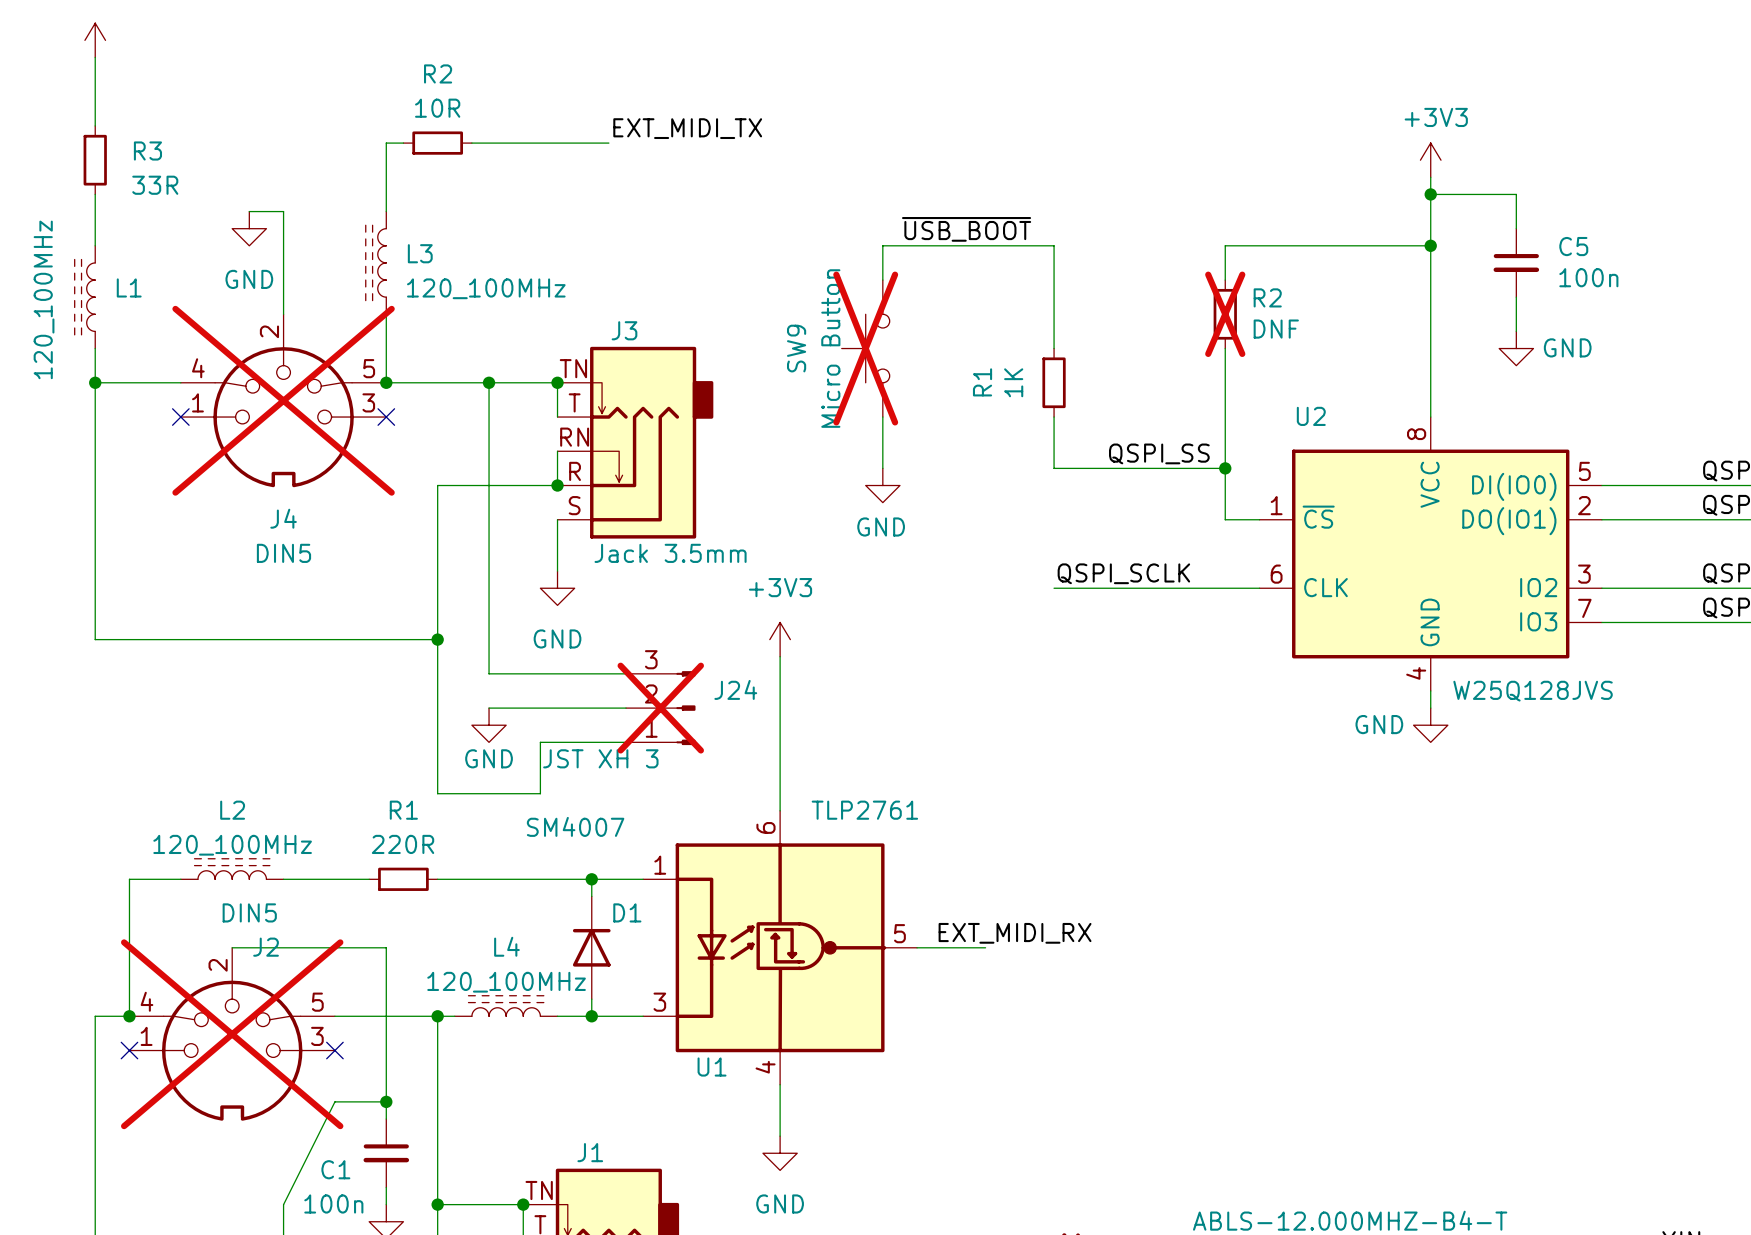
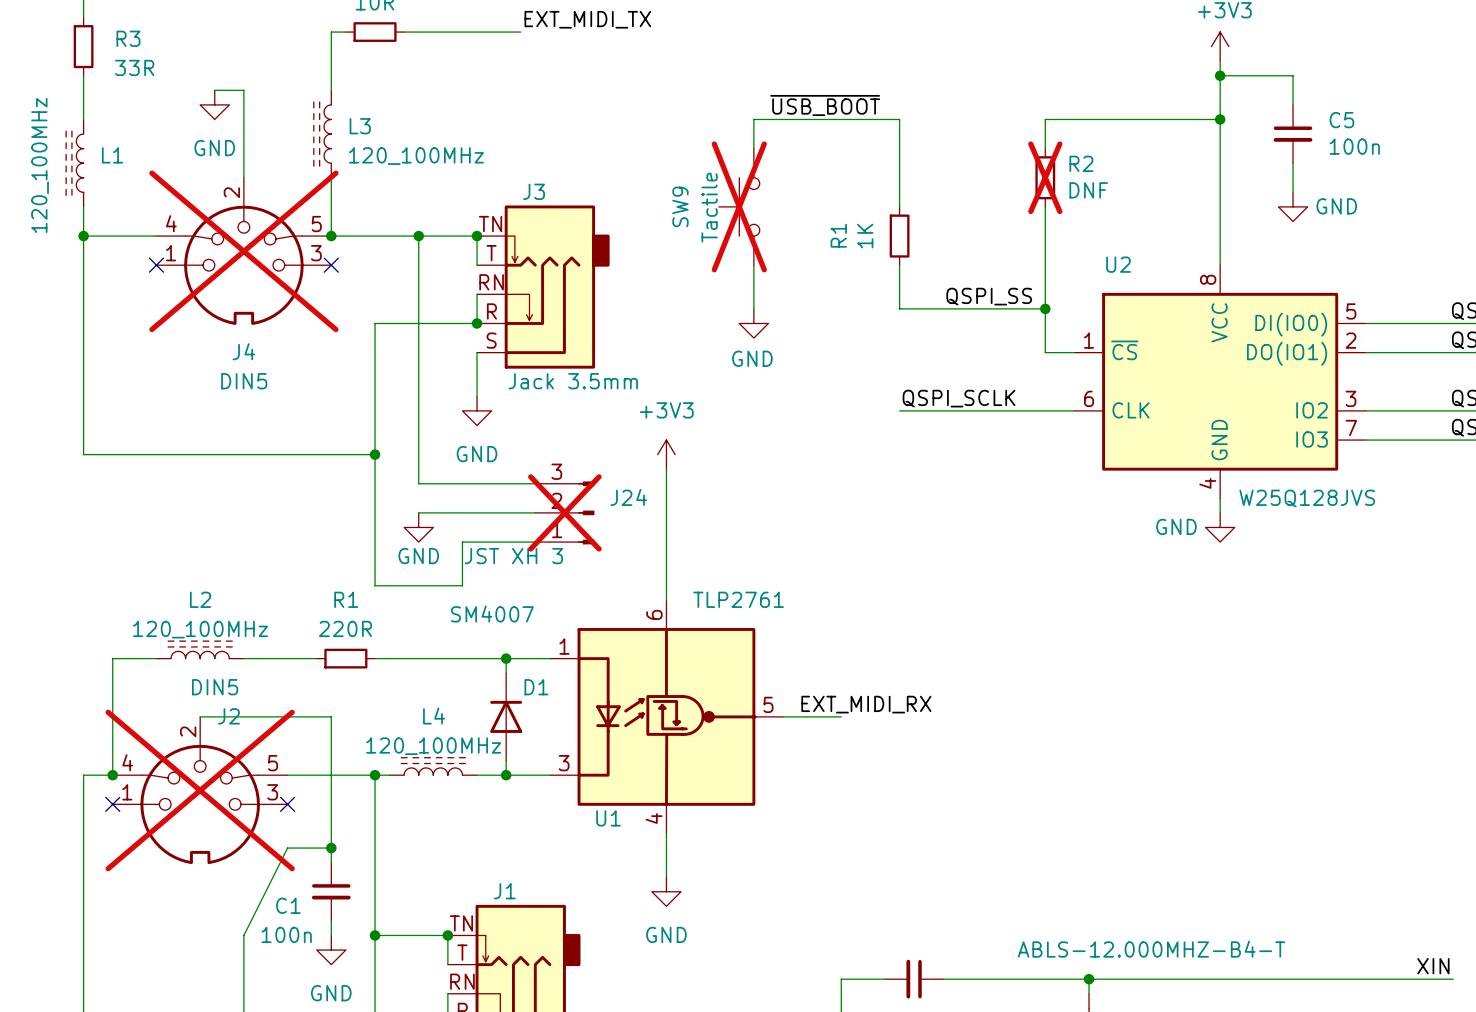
SW9 value: Micro Button (830, 348) -> Tactile (709, 207)

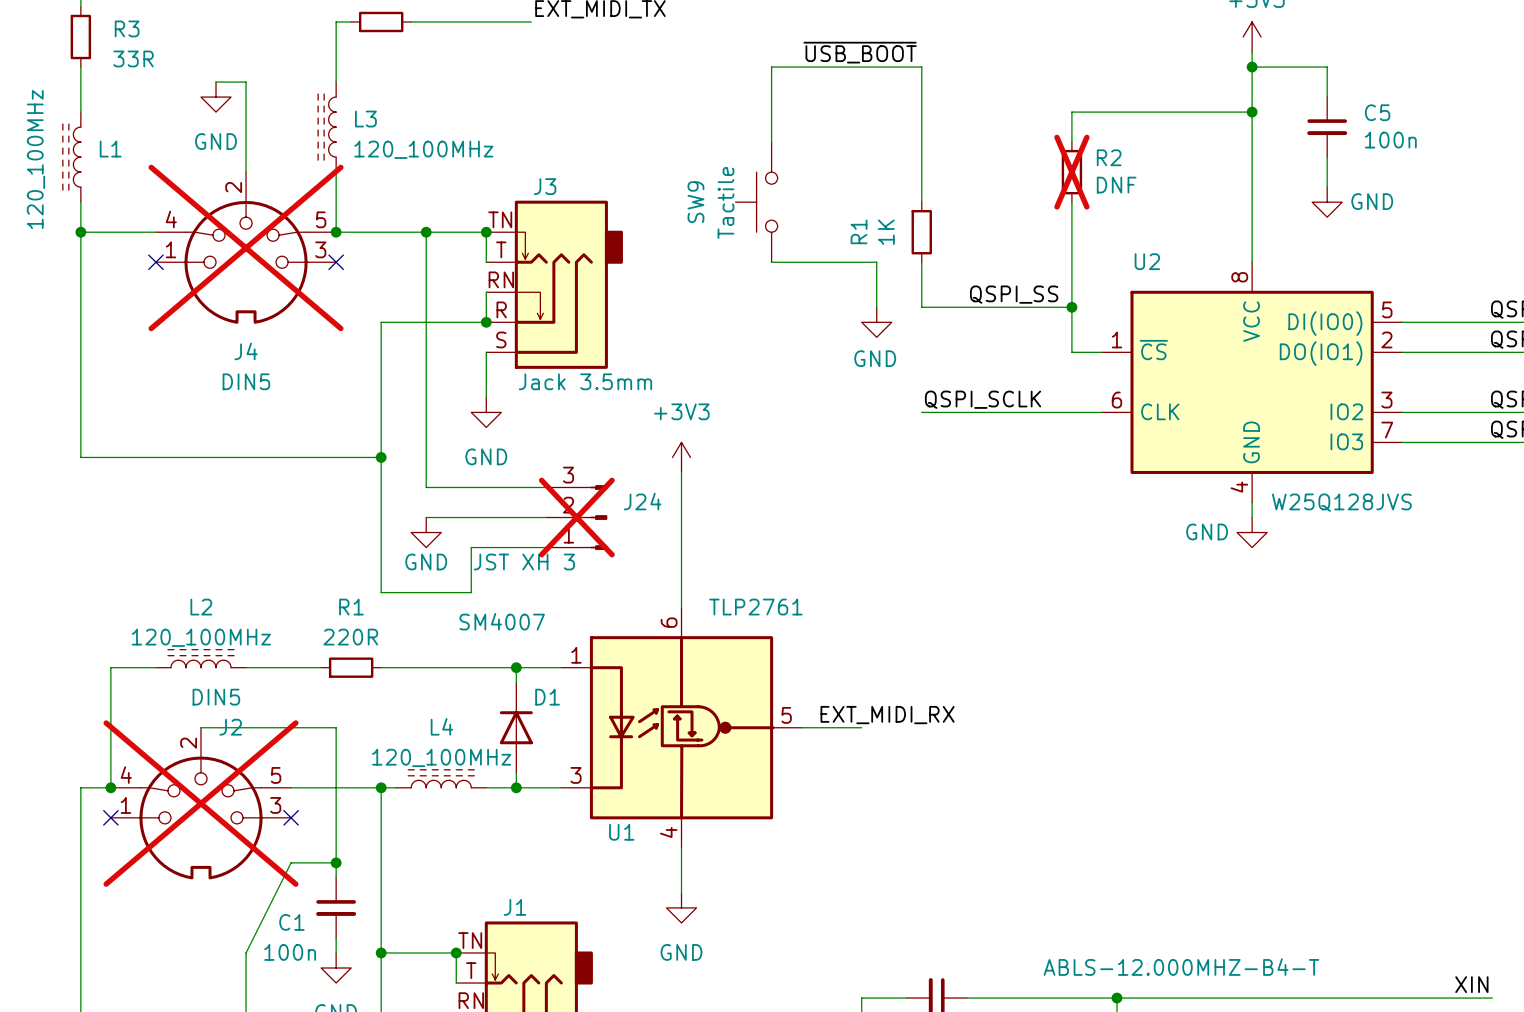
label position: ~{USB_BOOT} (825, 105) -> ~{USB_BOOT} (860, 52)
wire: (753, 119) (899, 119) -> (771, 112) (771, 67) (921, 67) (921, 112)
SW9 do-not-place cross: (739, 206) -> none
wire: (753, 265) (753, 308) -> (771, 262) (876, 262) (876, 307)
power symbol position: GND (753, 323) -> GND (876, 322)

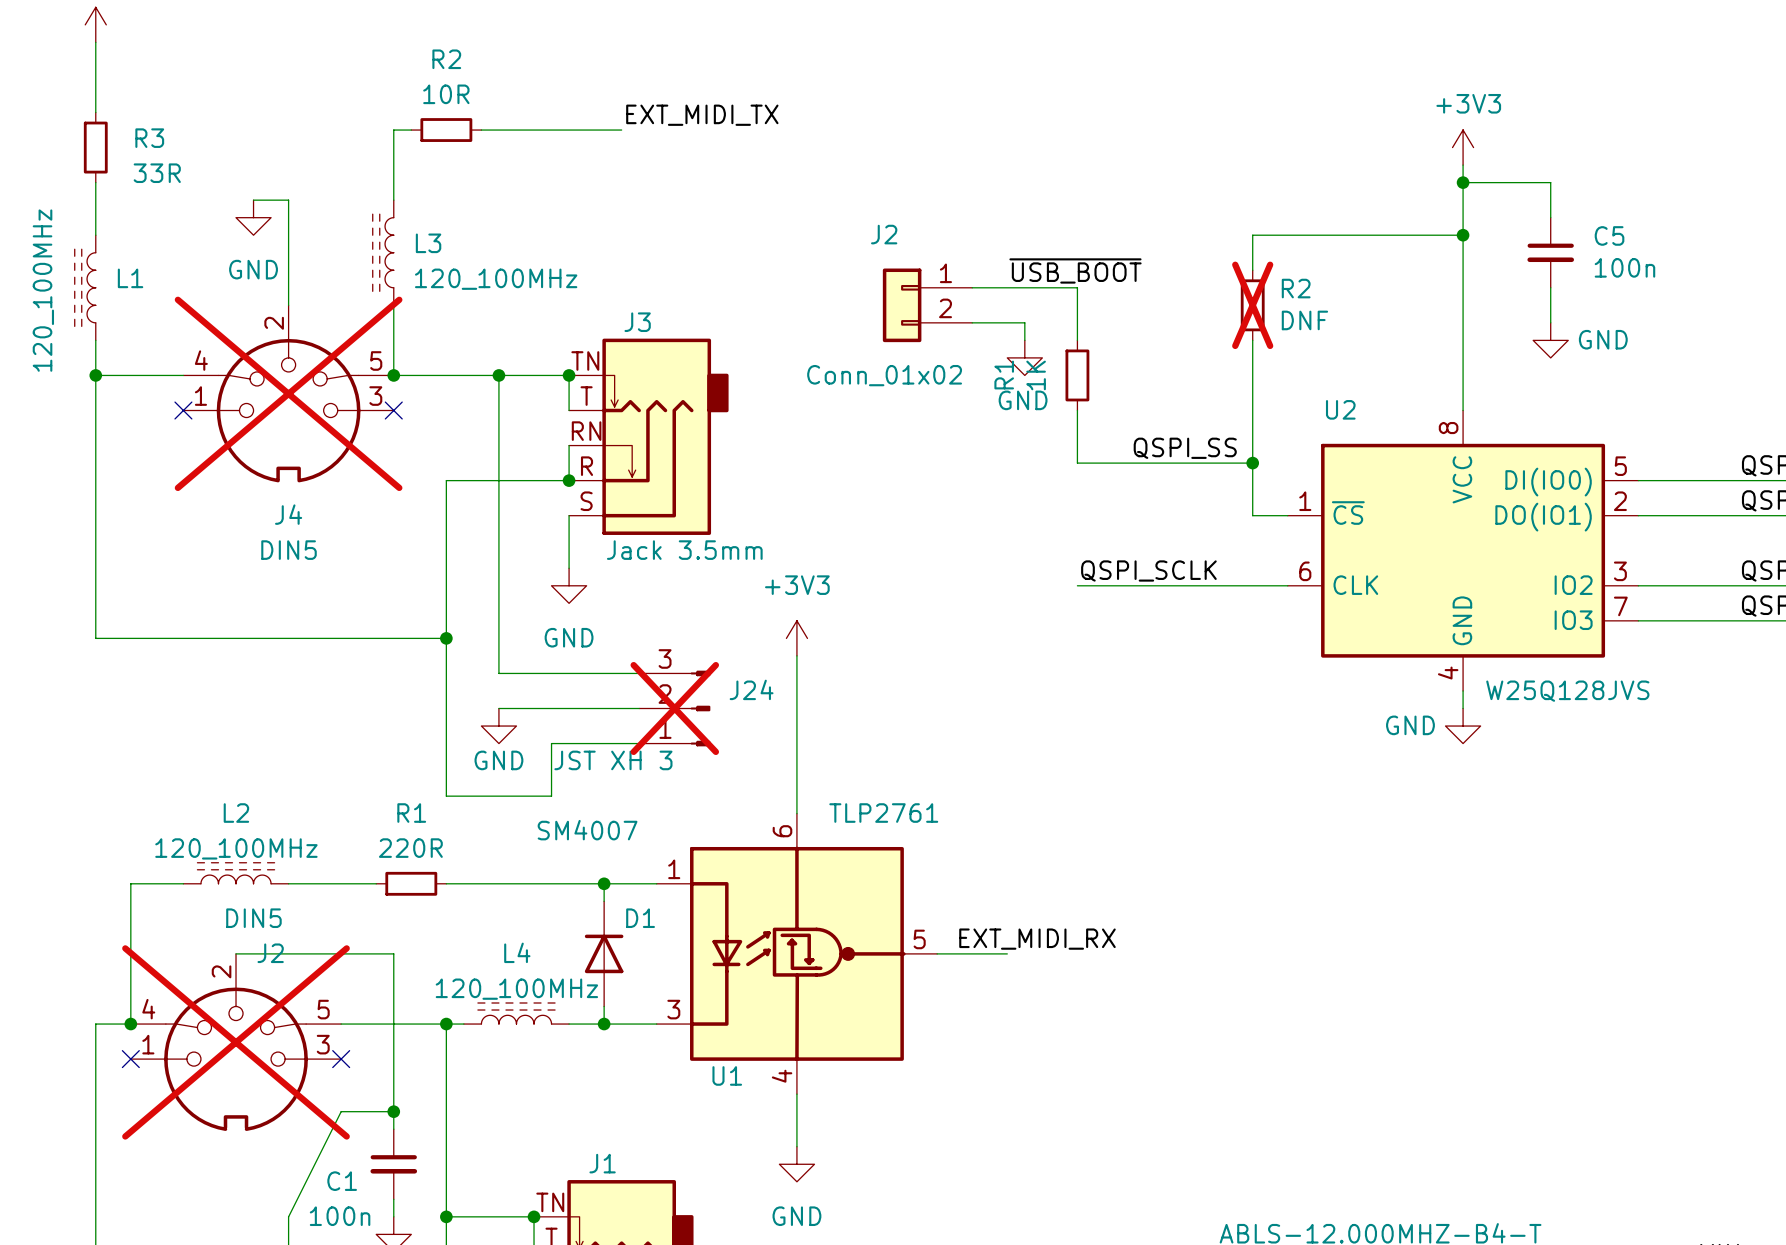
label position: ~{USB_BOOT} (860, 52) -> ~{USB_BOOT} (1075, 270)
wire: (771, 142) (771, 67) (921, 67) (921, 157) -> (972, 287) (1077, 287)
J2: none -> Conn_01x02 (927, 305)
wire: none -> (972, 322) (1024, 322) (1024, 340)
SW9: Tactile (756, 202) -> none
wire: (771, 262) (876, 262) (876, 307) -> none
power symbol position: GND (876, 322) -> GND (1024, 357)

